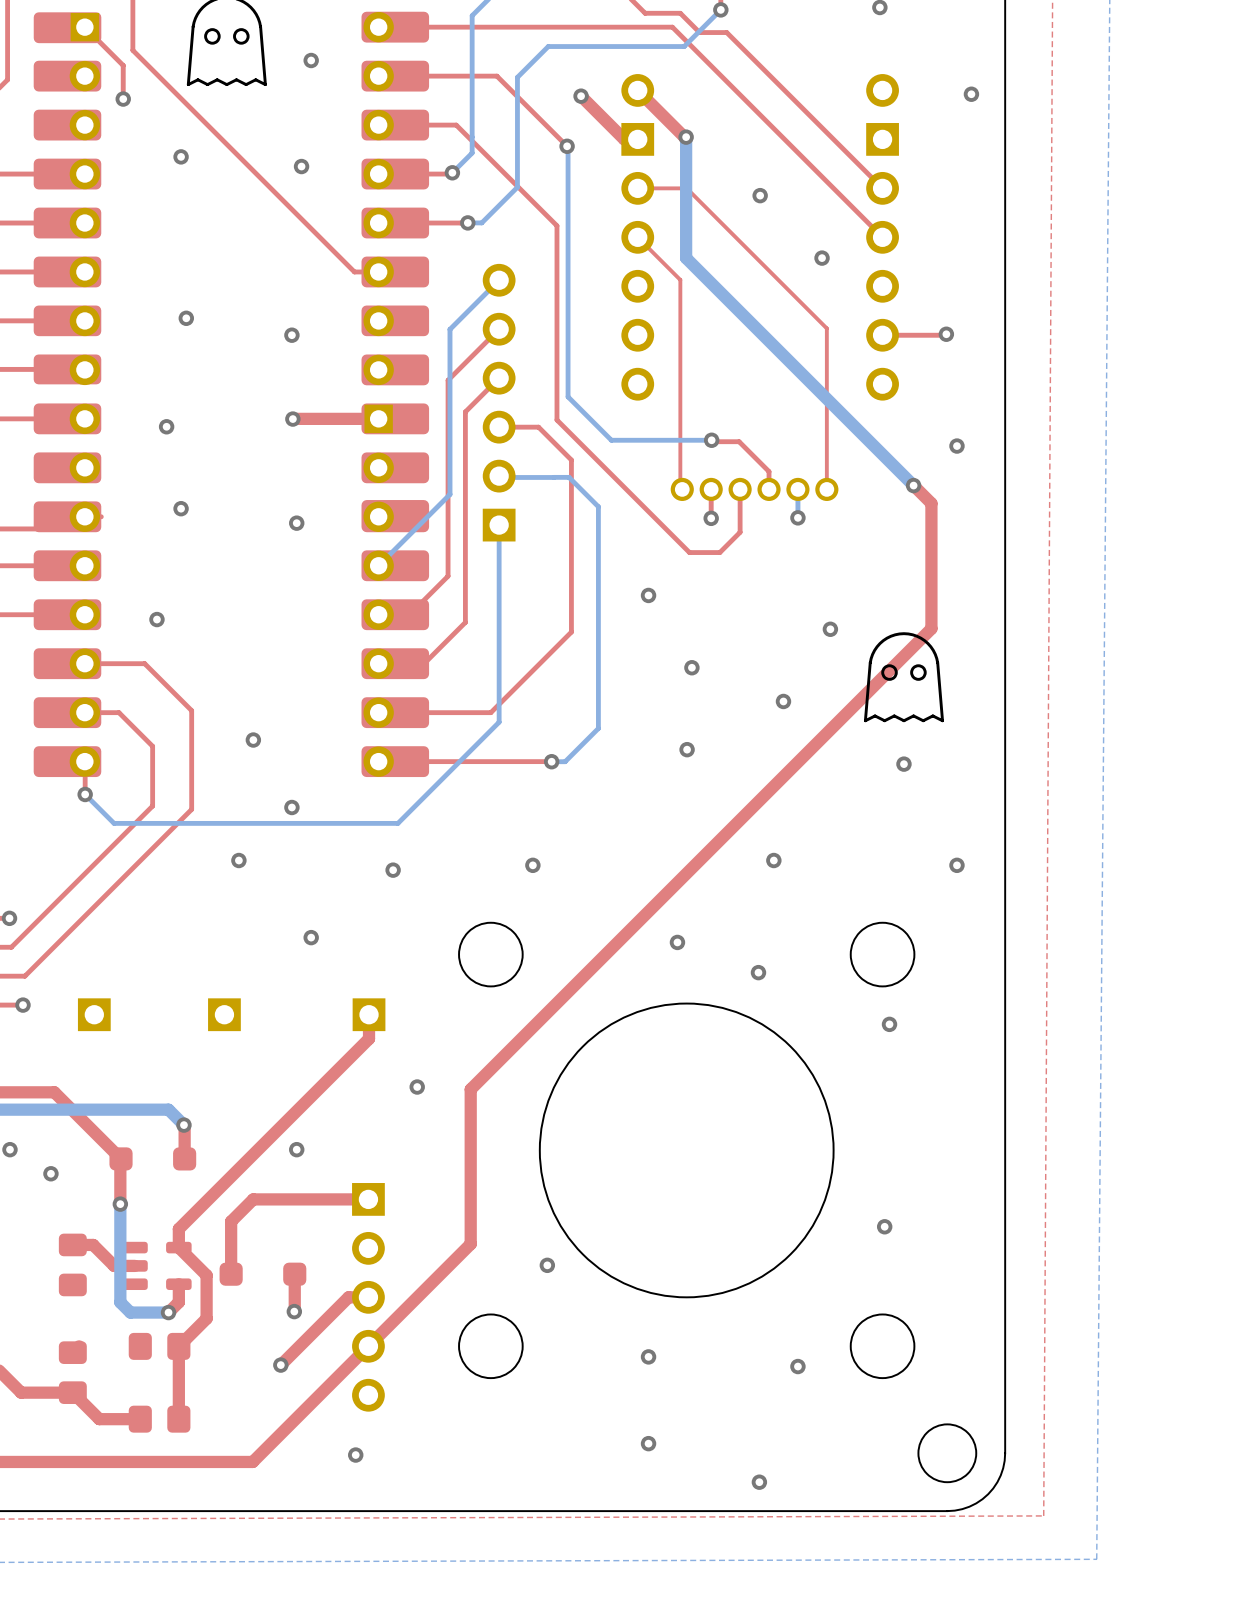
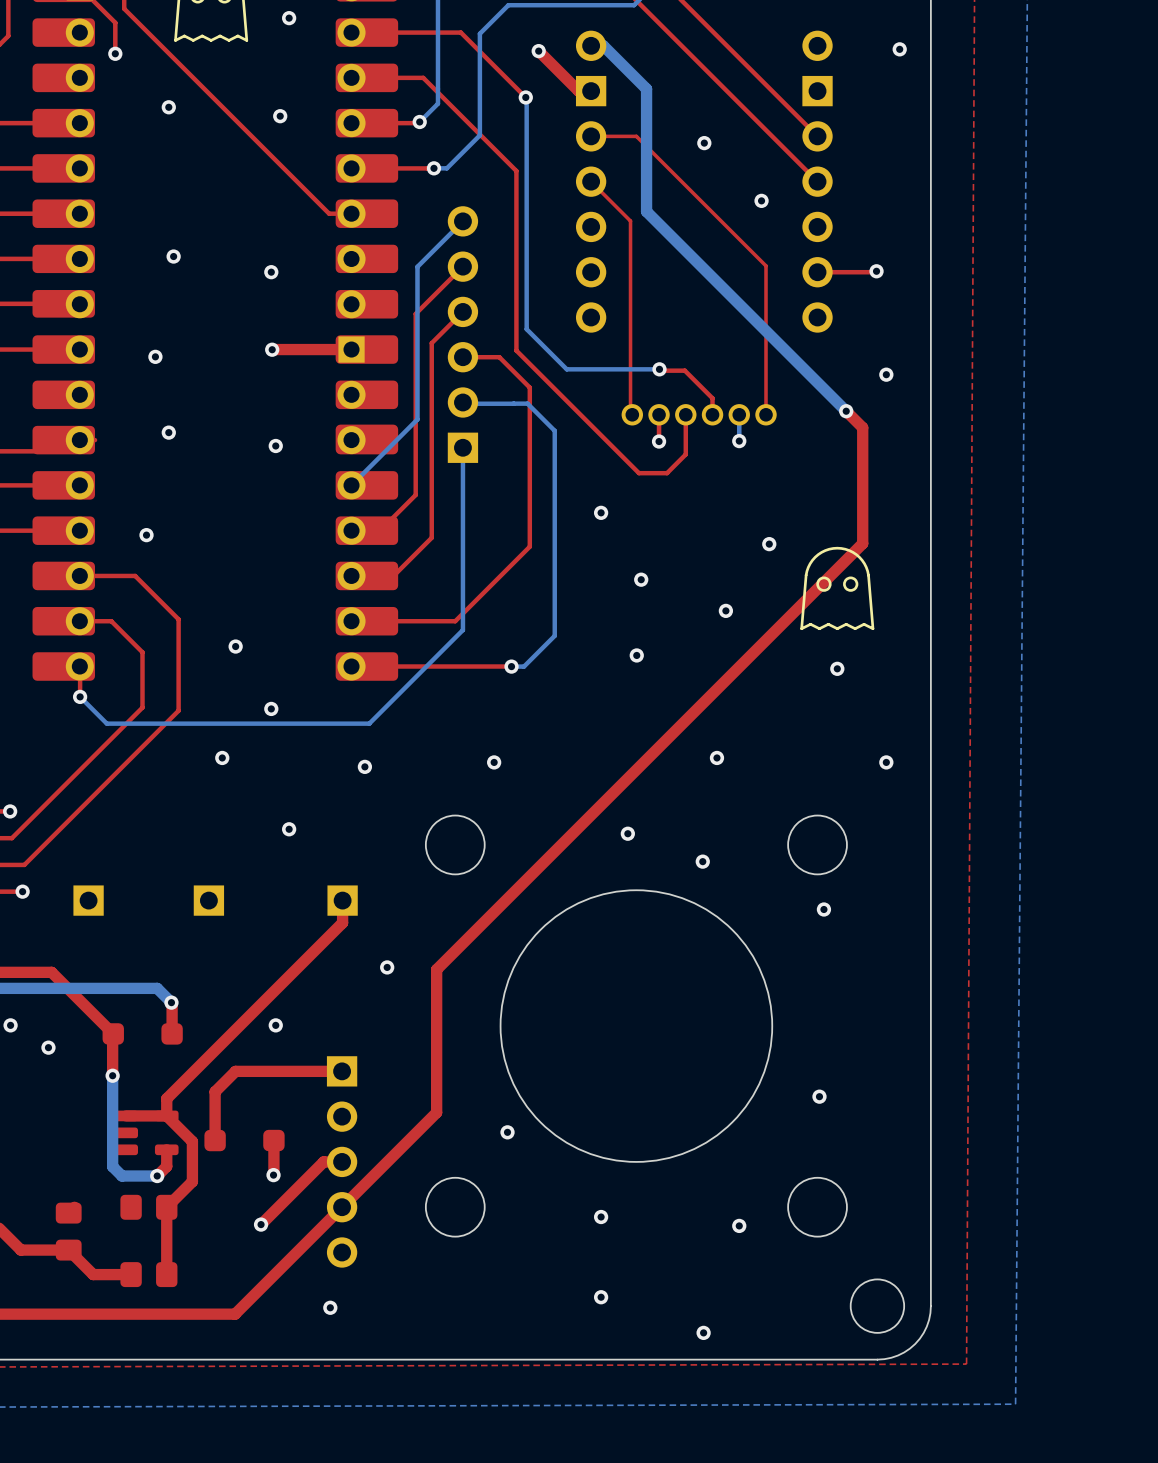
top track: (637, 90) (686, 137) -> none
bottom track: (686, 137) (686, 258) (697, 269) -> (591, 45) (603, 45) (646, 89) (646, 211)
via: (686, 137) -> none
top track: (72, 1244) (93, 1244) (114, 1265) (135, 1265) -> none
top track: none -> (166, 1115) (126, 1115)
part: (72, 1264) -> none

